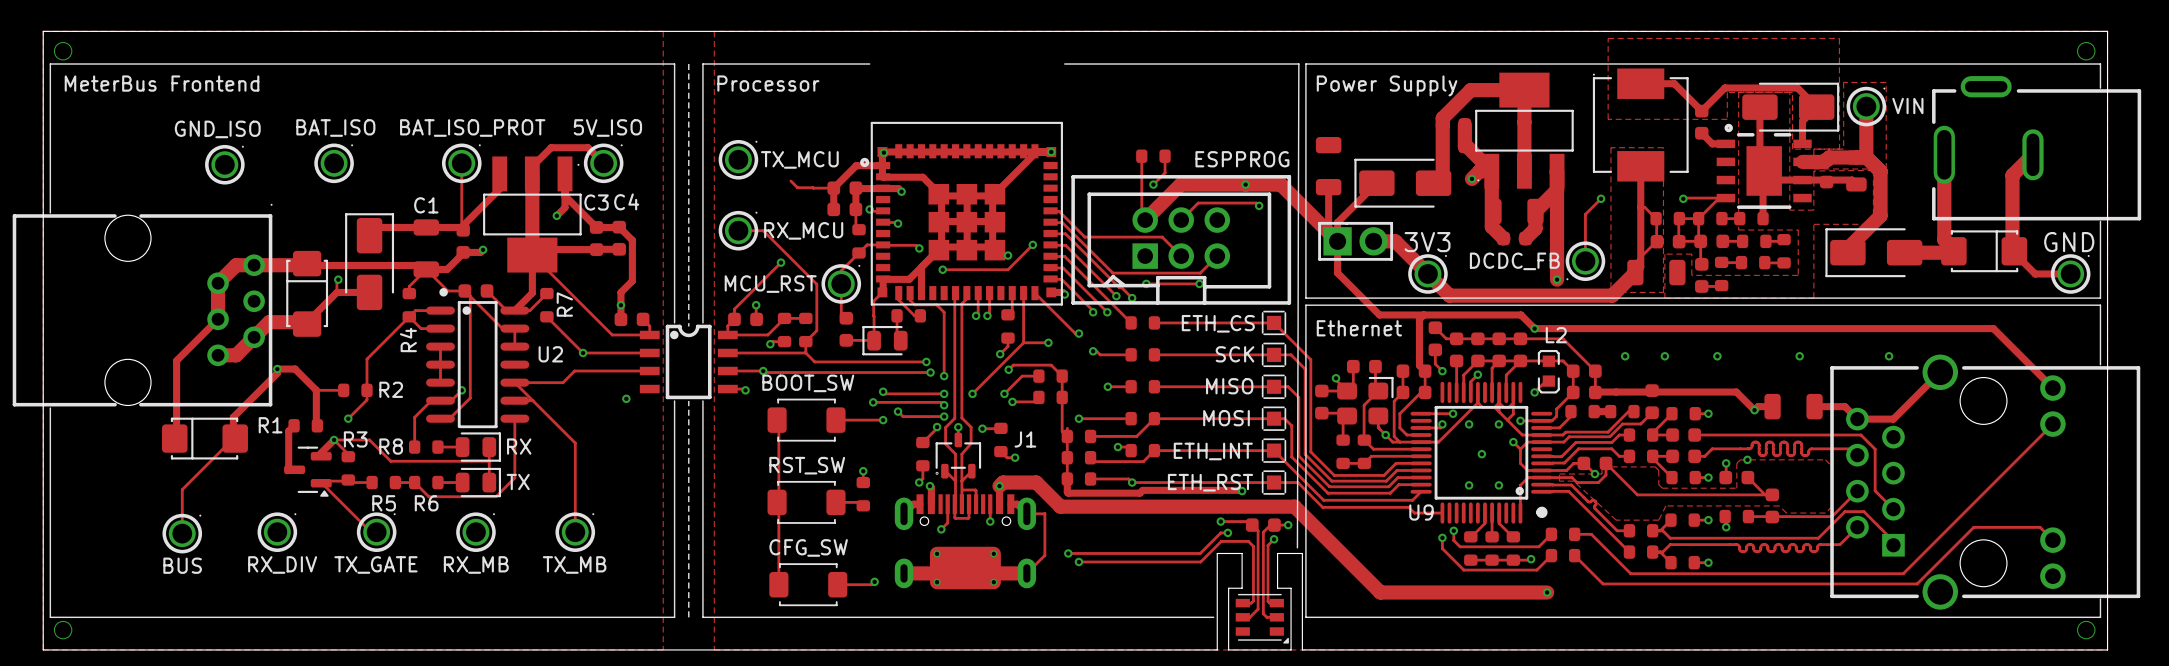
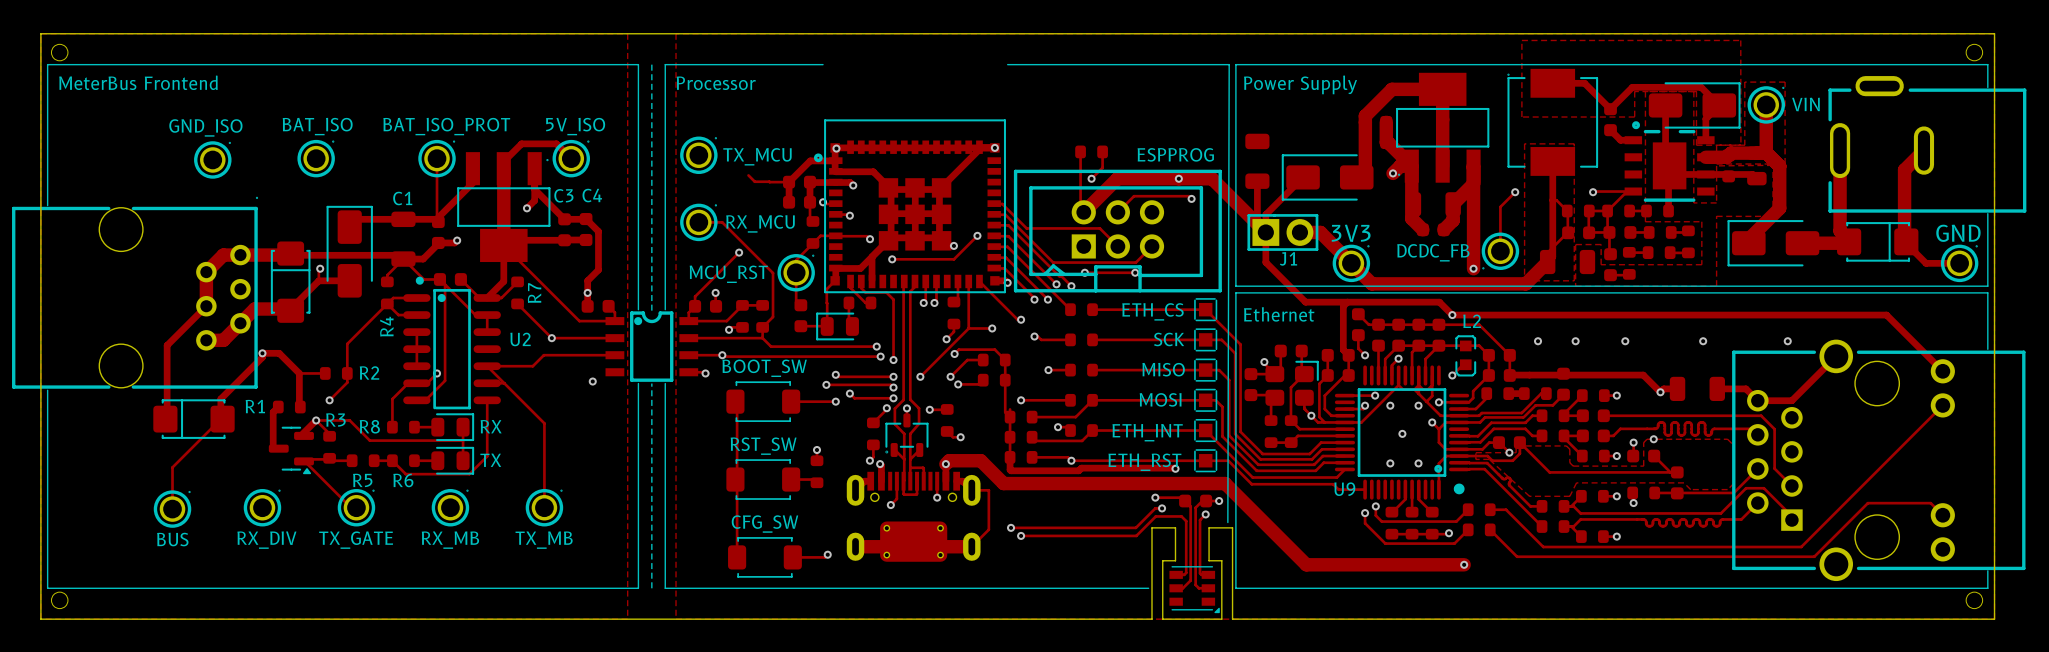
J1 name position: J1 (1025, 439) -> J1 (1288, 258)

